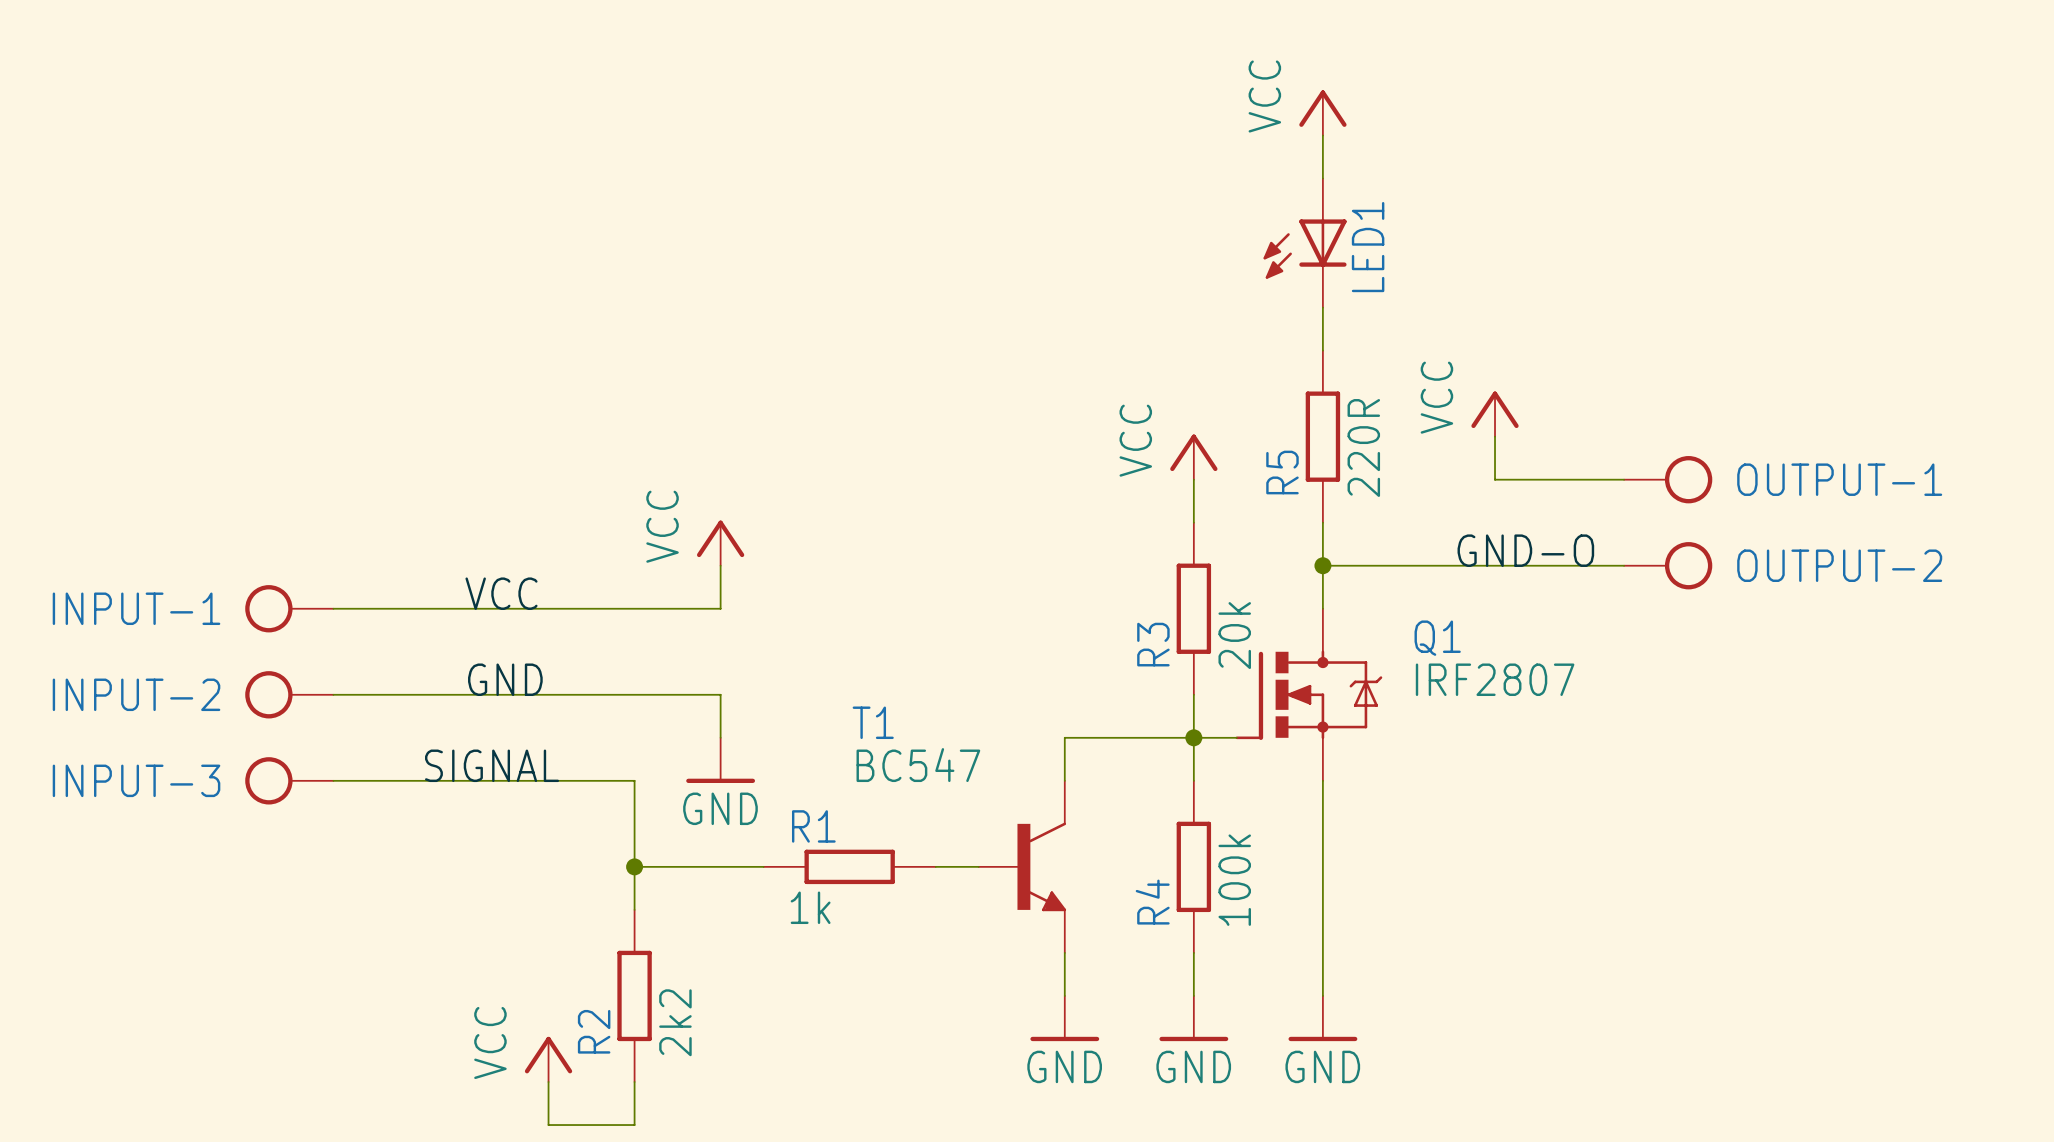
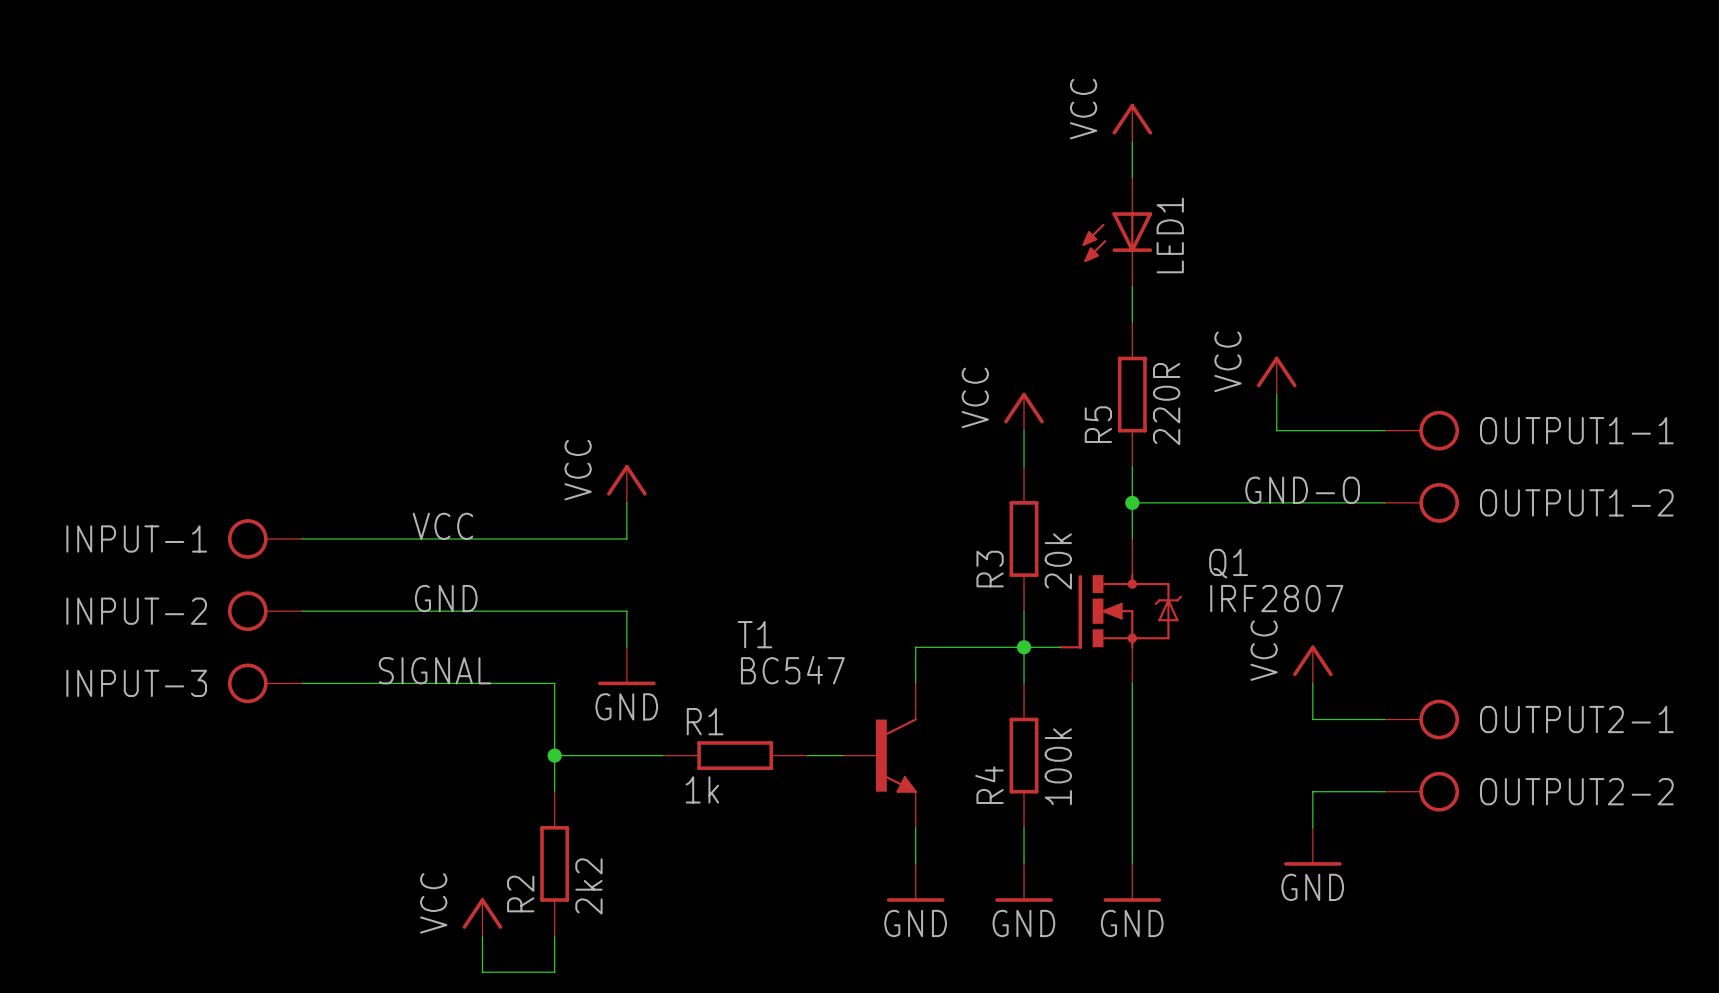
OUTPUT-1 name: OUTPUT-1 (1839, 479) -> OUTPUT1-1 (1576, 430)
OUTPUT-2 name: OUTPUT-2 (1839, 565) -> OUTPUT1-2 (1576, 502)
power symbol: none -> VCC (1312, 664)
wire: none -> (1312, 683) (1312, 719) (1385, 719)
OUTPUT2-1: none -> (1422, 719)
wire: none -> (1385, 791) (1312, 791) (1312, 827)
OUTPUT2-2: none -> (1422, 791)
power symbol: none -> GND (1312, 846)

